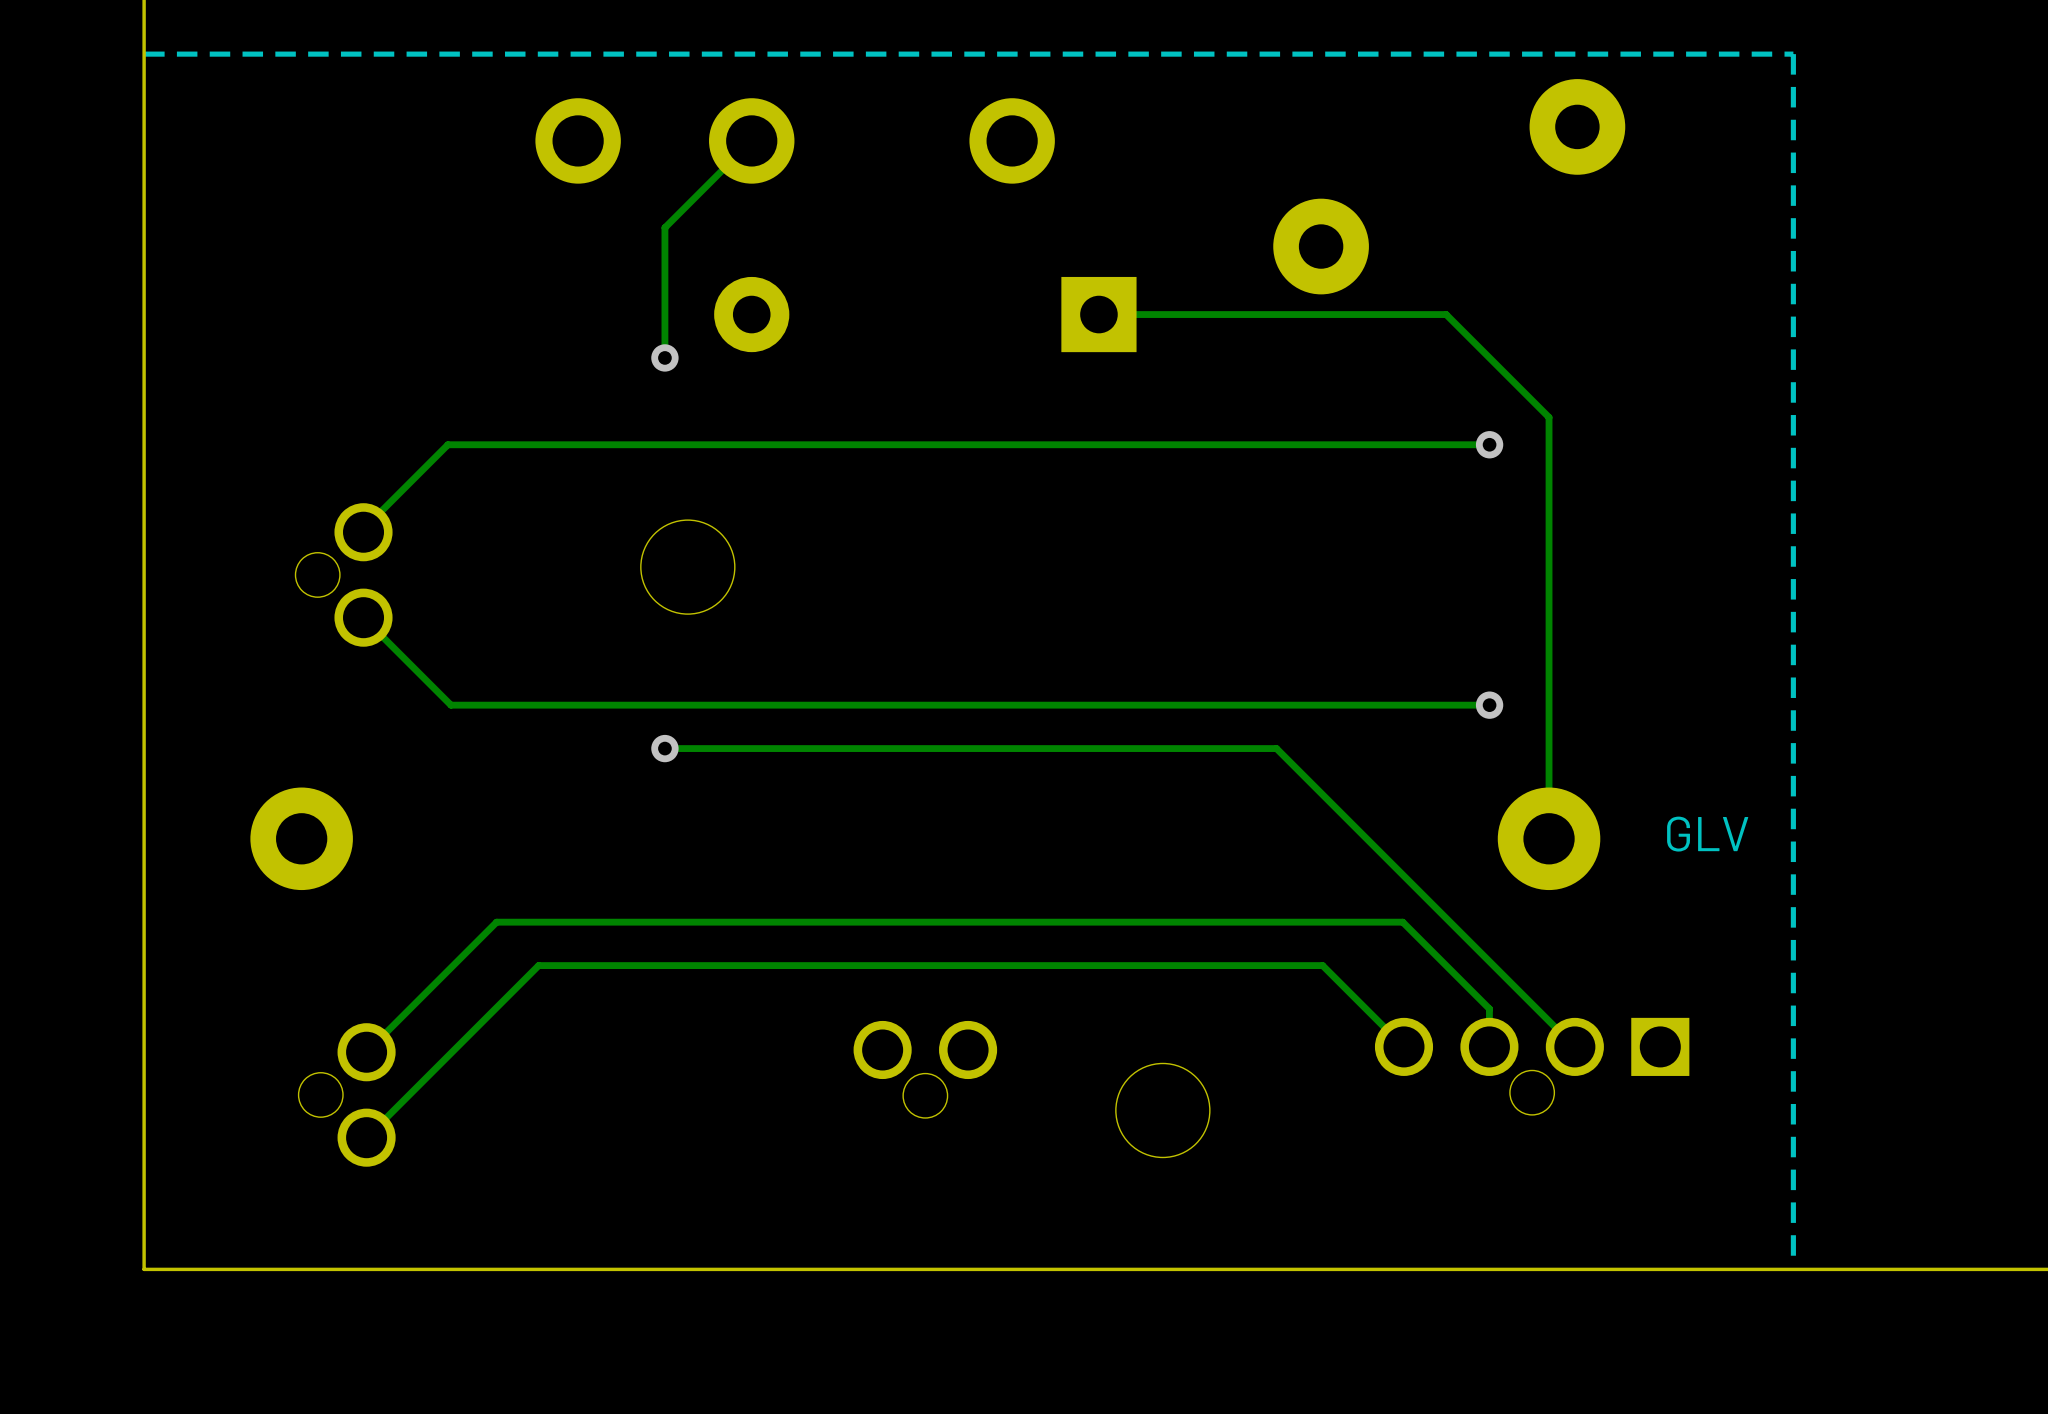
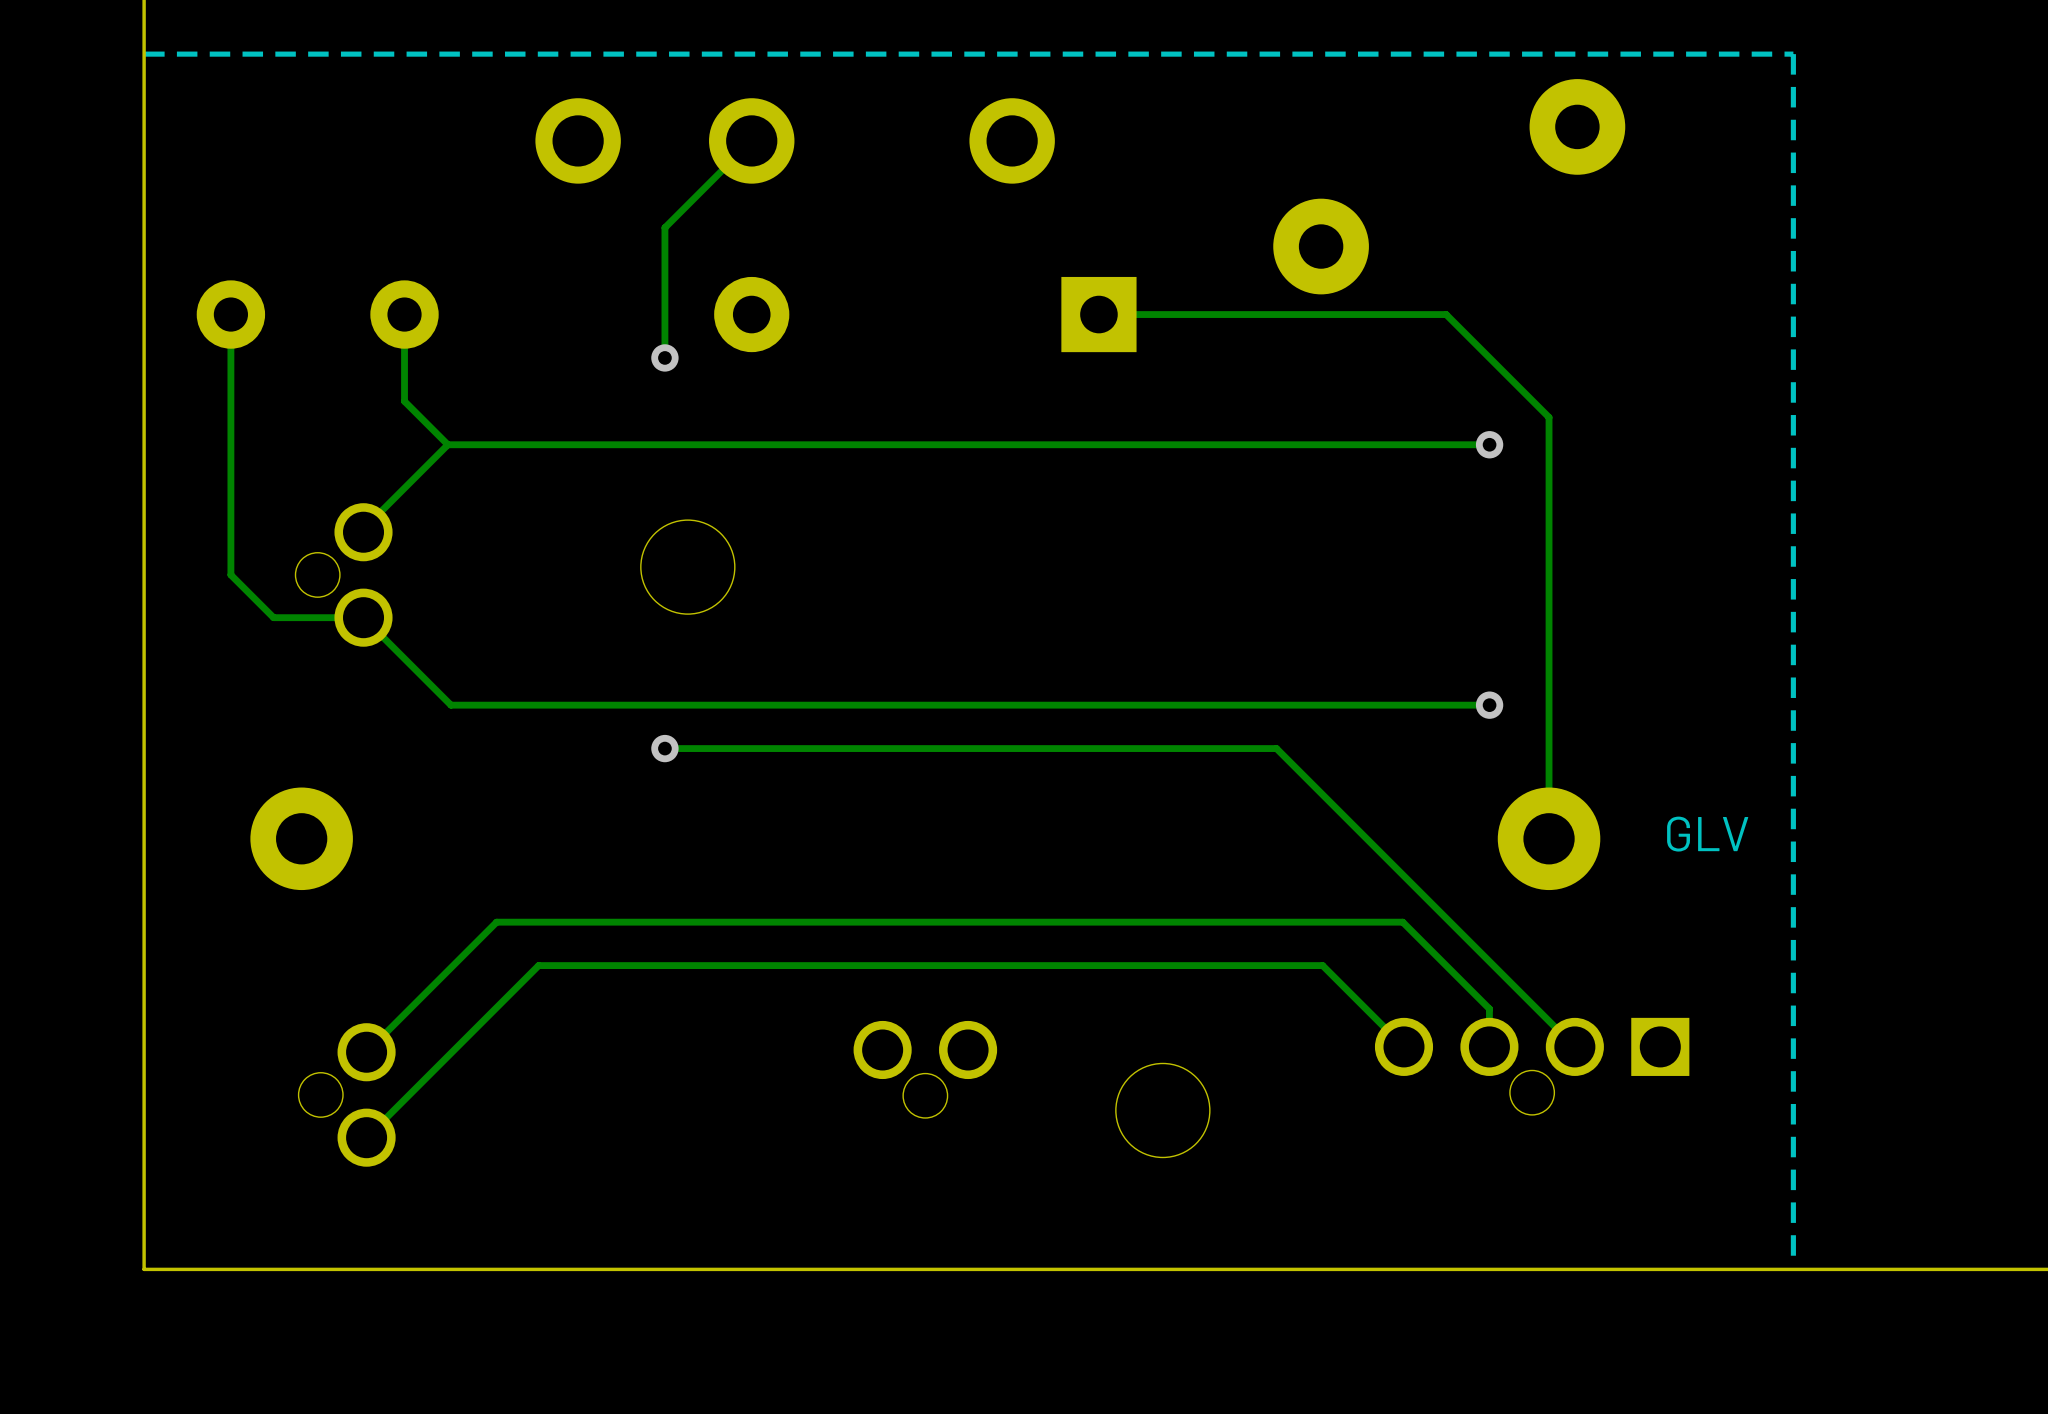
track: none -> (230, 314) (230, 574) (273, 617) (363, 617)
part: none -> (230, 314)
track: none -> (404, 314) (404, 401) (447, 444)
part: none -> (404, 314)

